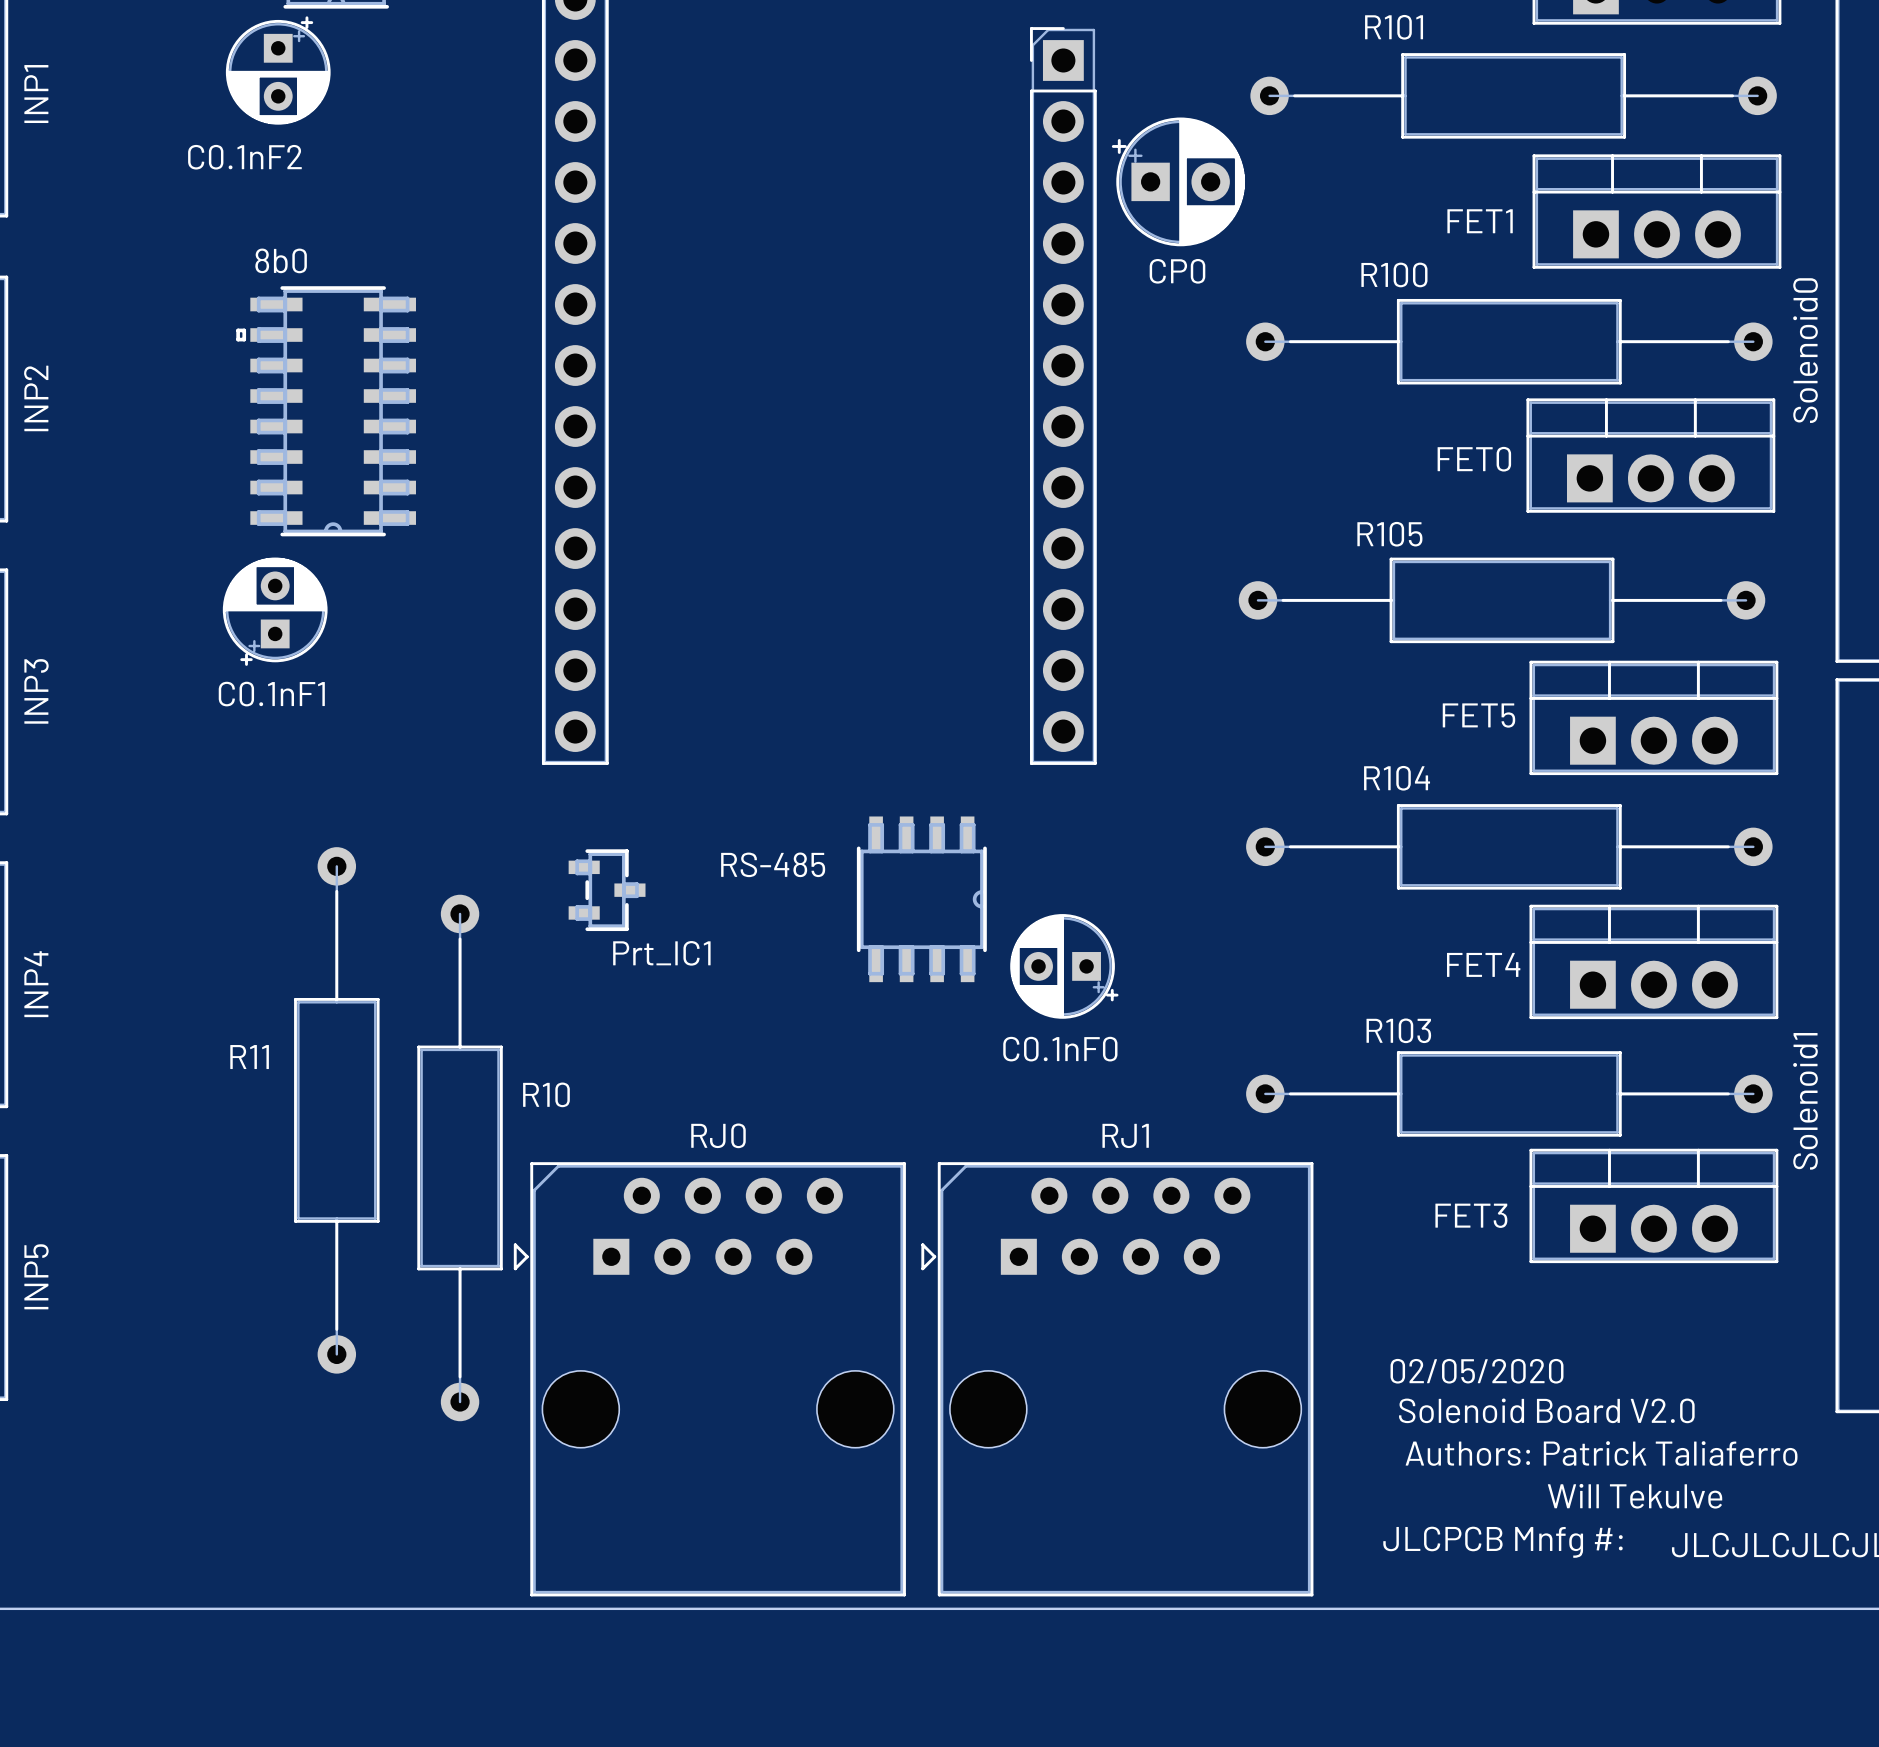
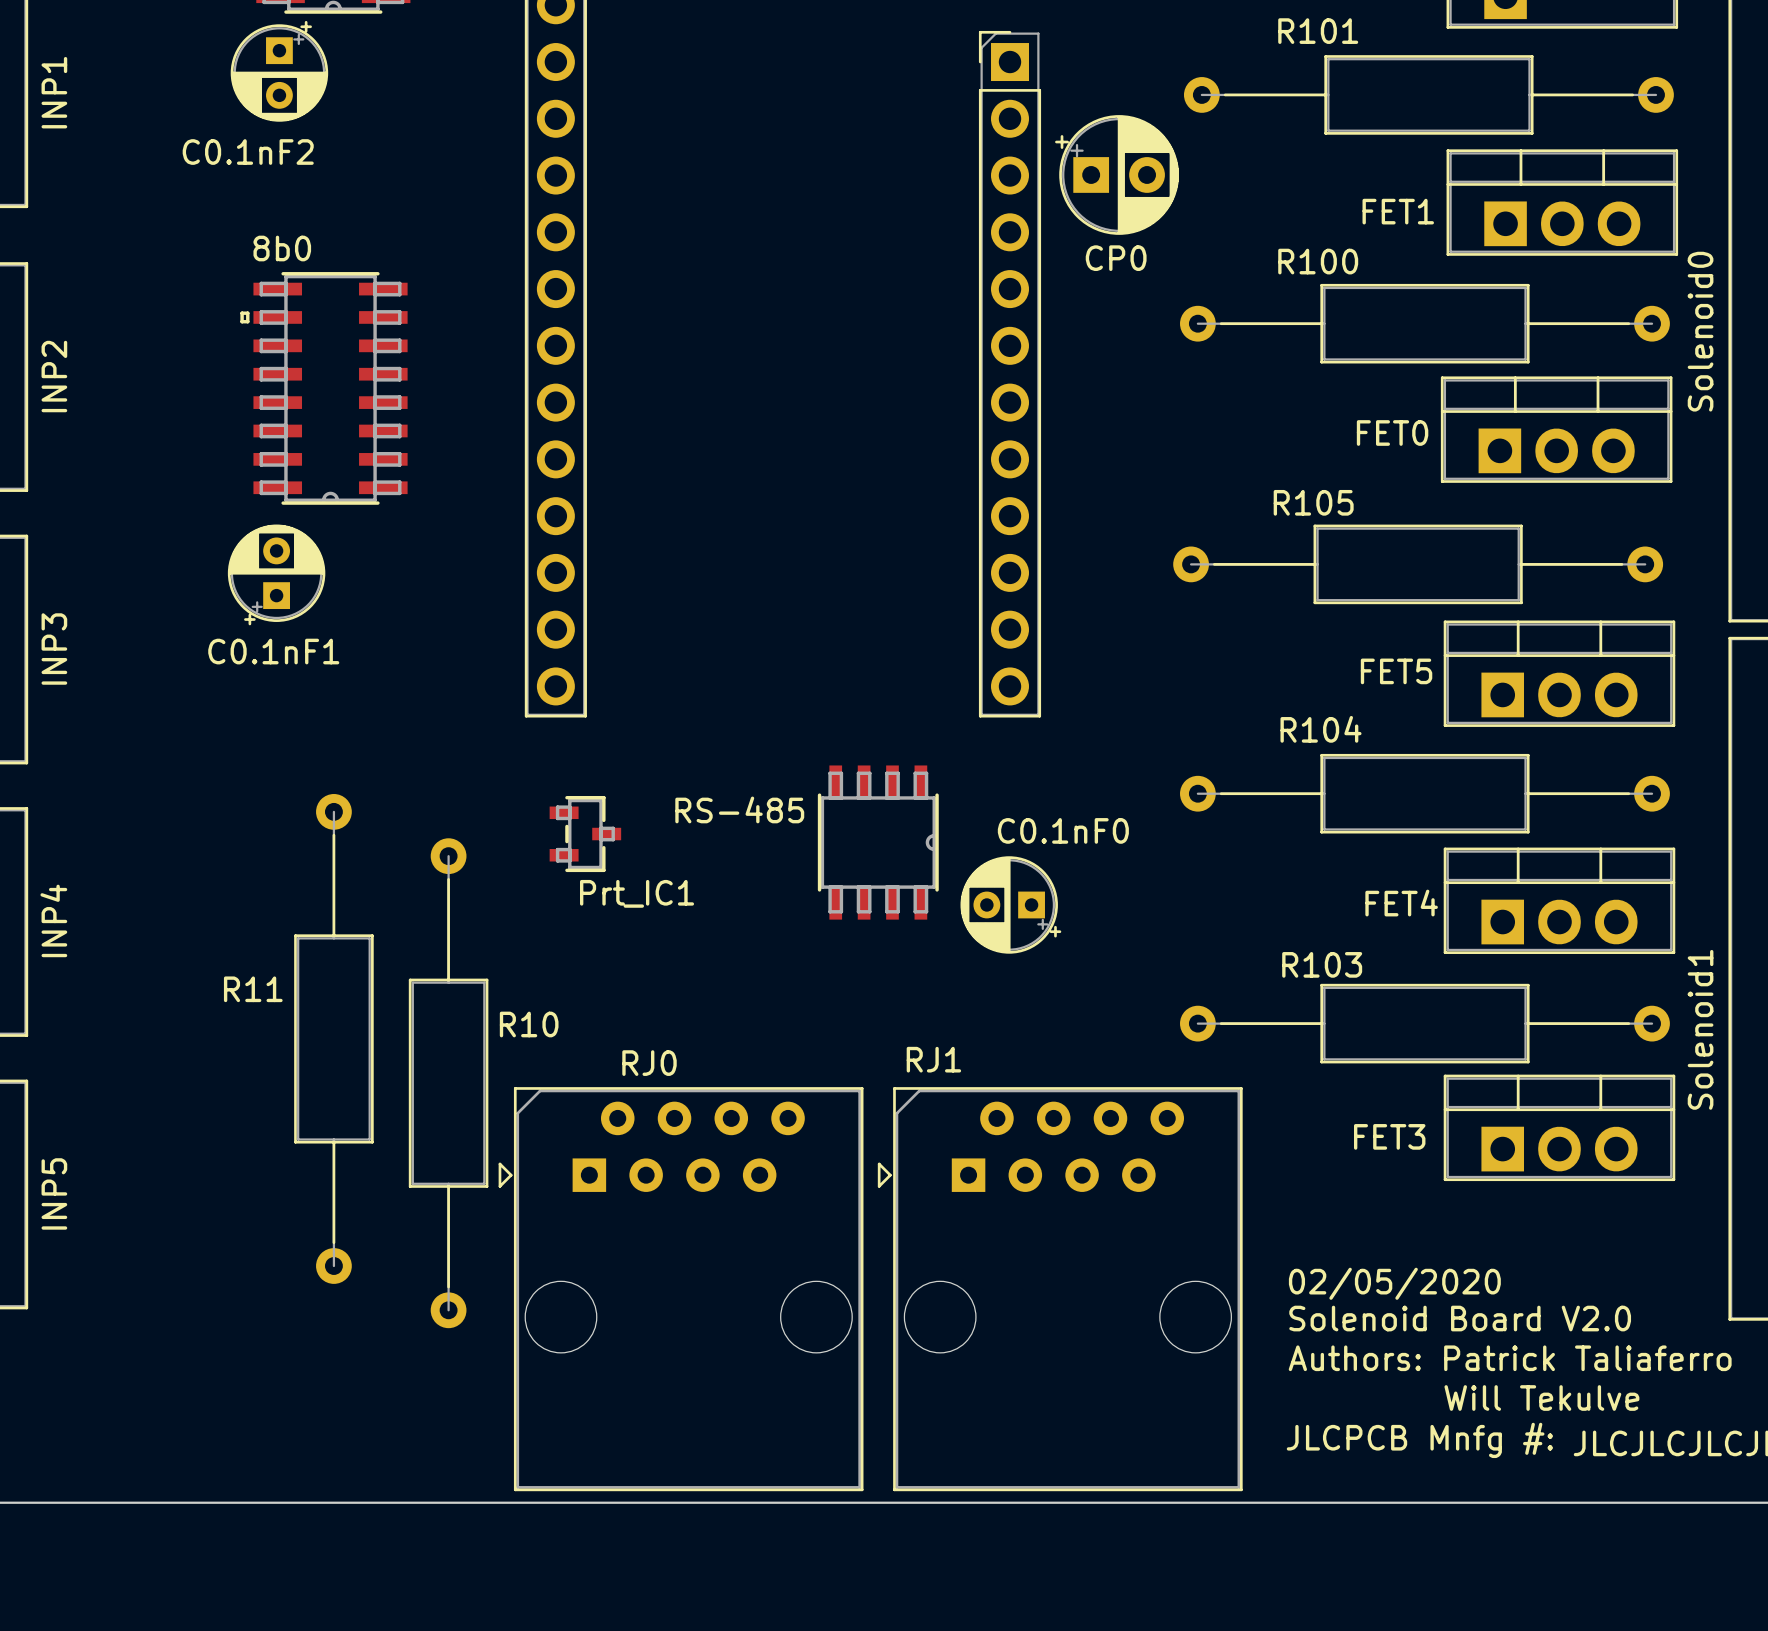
C0.1nF0 name position: C0.1nF0 (1060, 1049) -> C0.1nF0 (1063, 830)
RJ0 name position: RJ0 (718, 1135) -> RJ0 (649, 1063)
RJ1 name position: RJ1 (1125, 1135) -> RJ1 (933, 1059)

